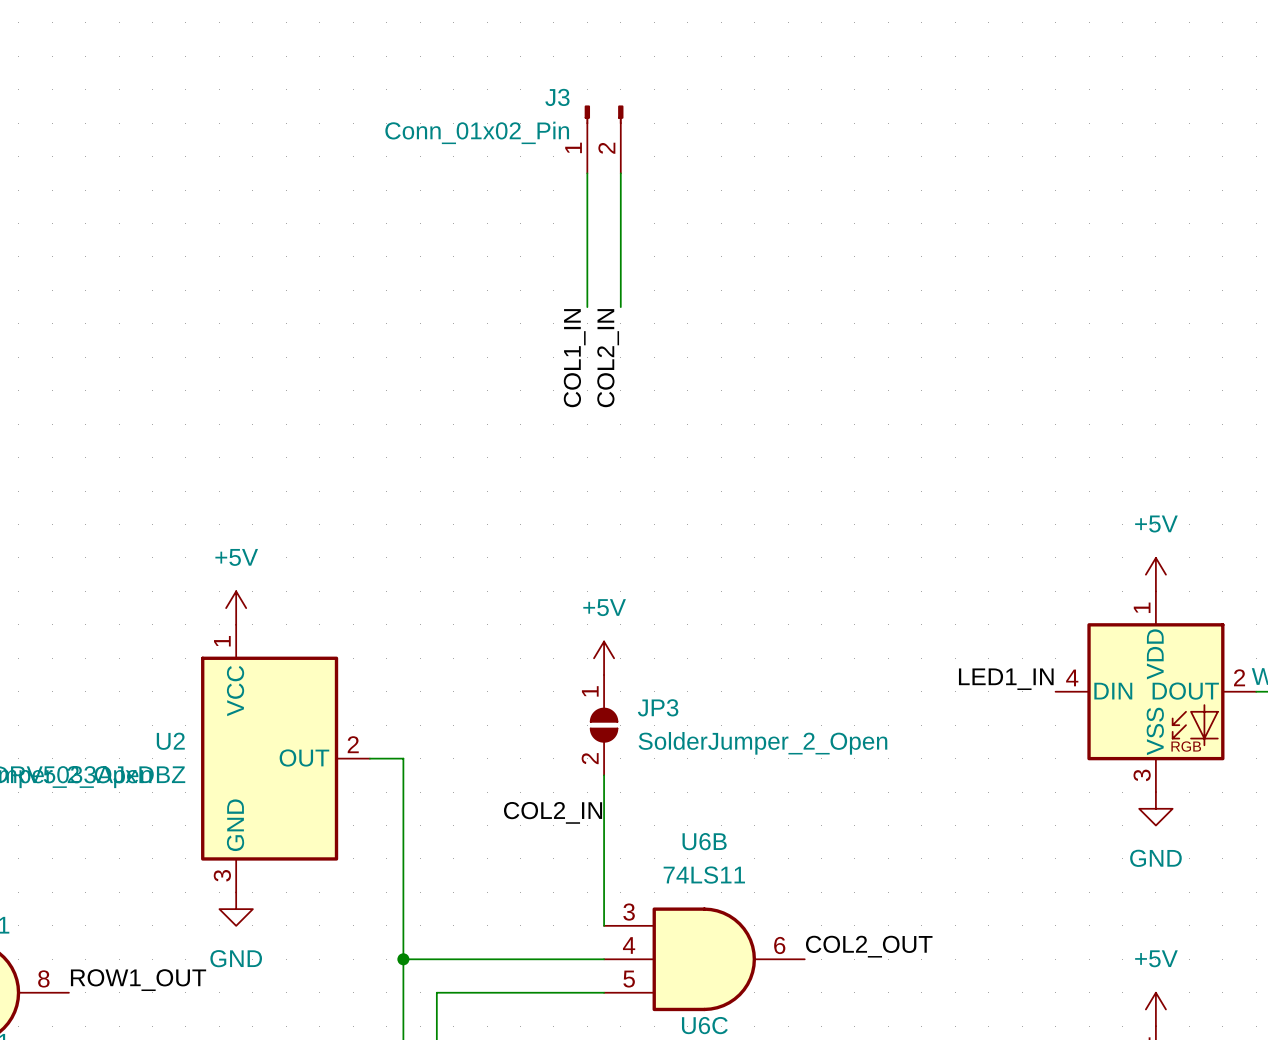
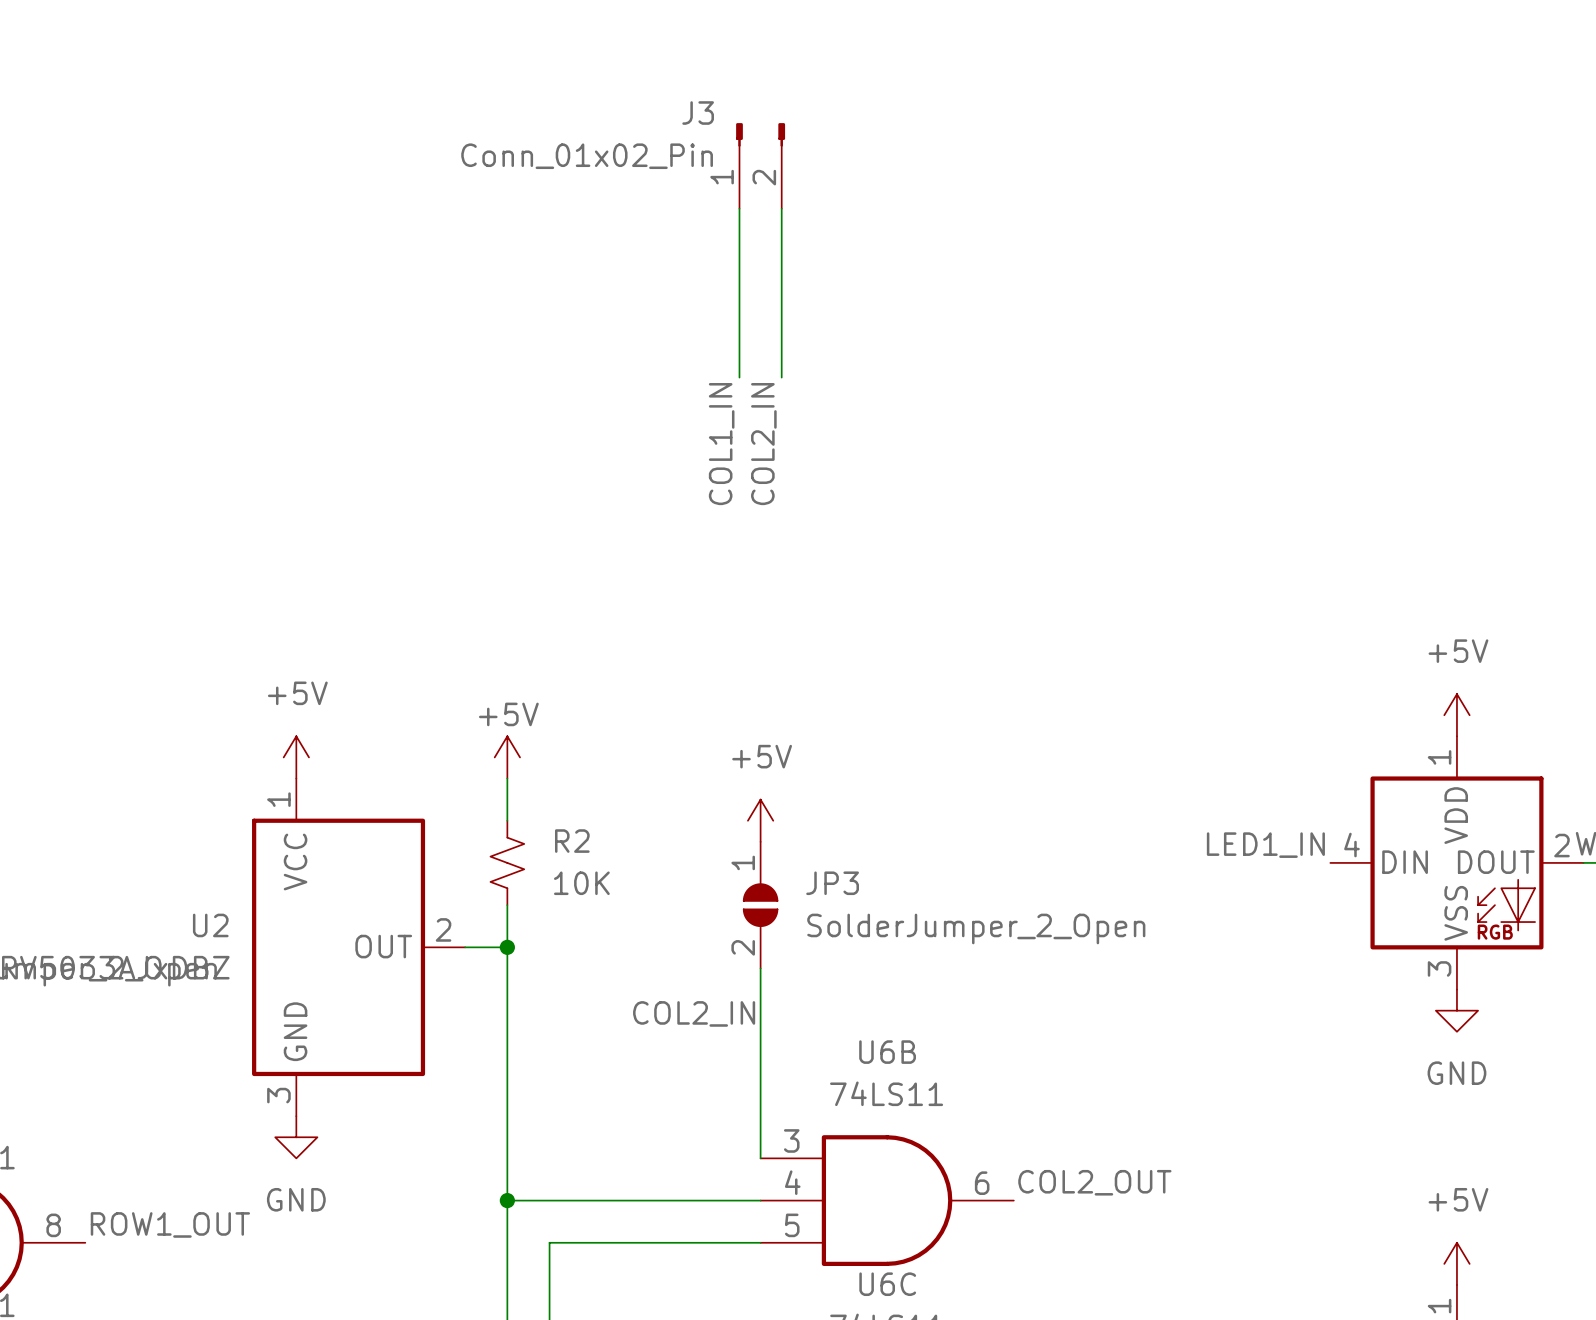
power symbol: none -> +5V (507, 757)
wire: none -> (507, 778) (507, 820)
R2: none -> 10K (507, 862)
wire: none -> (507, 905) (507, 947)
junction: none -> (507, 947)

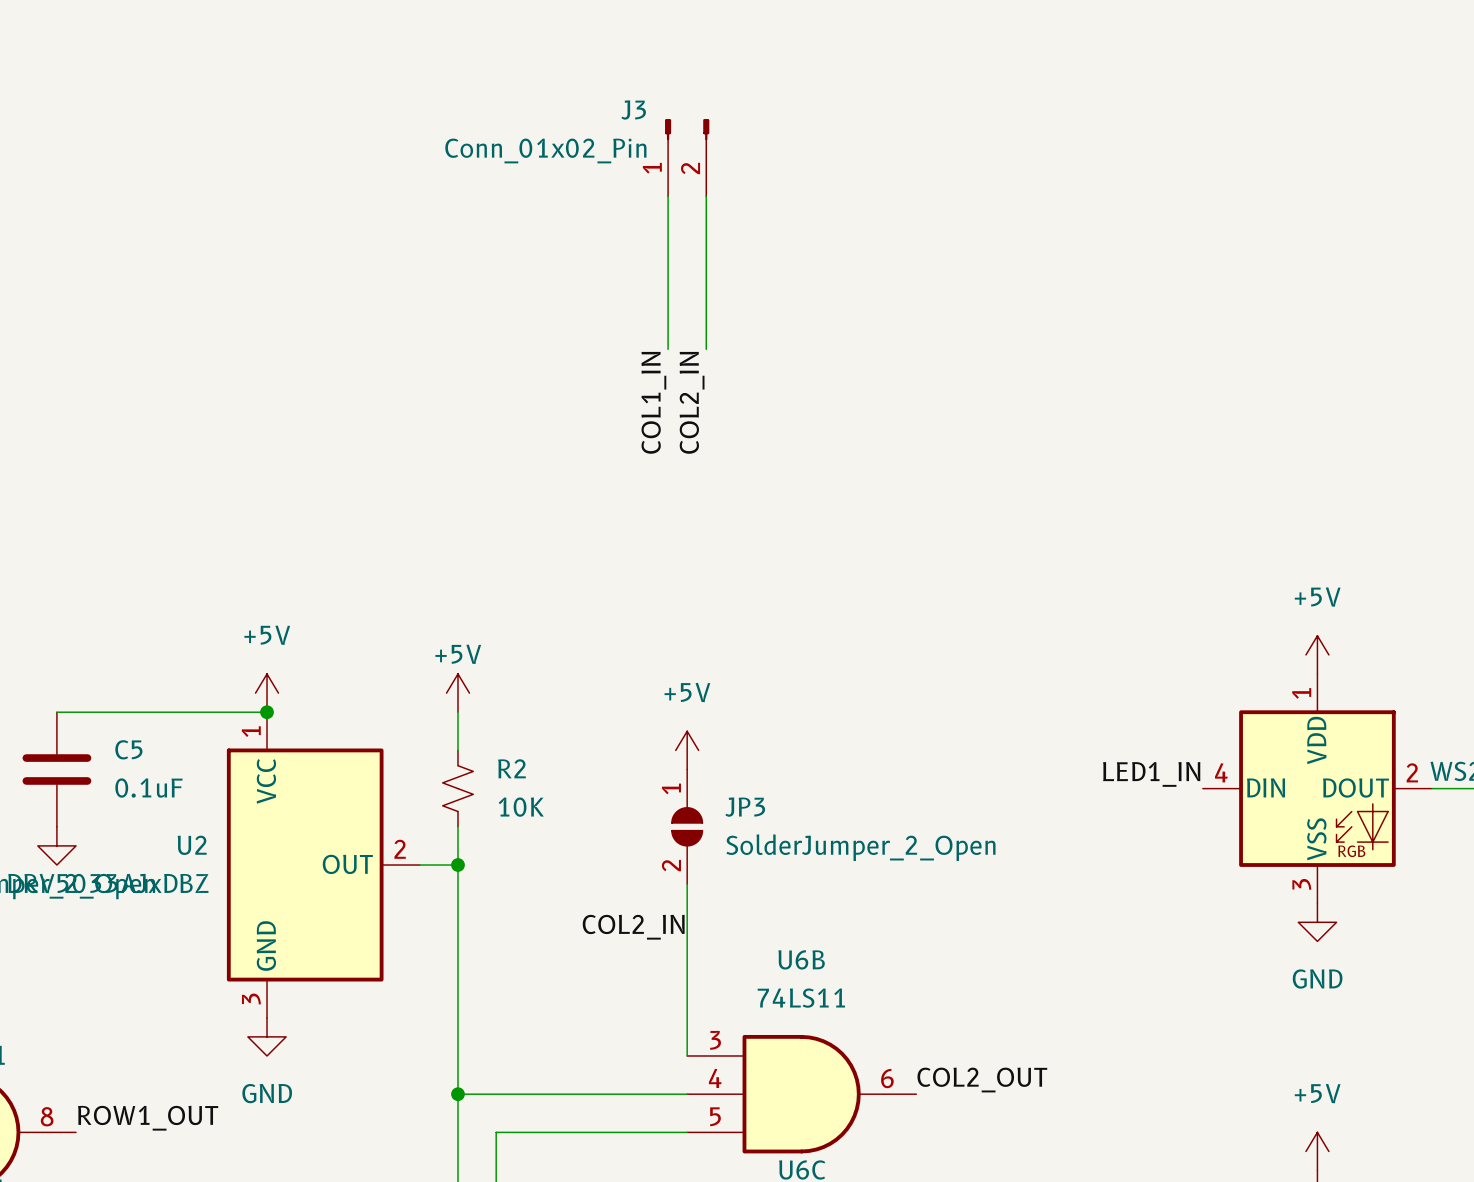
wire: none -> (56, 712) (267, 712)
junction: none -> (267, 712)
C5: none -> 0.1uF (56, 769)
power symbol: none -> (56, 845)

